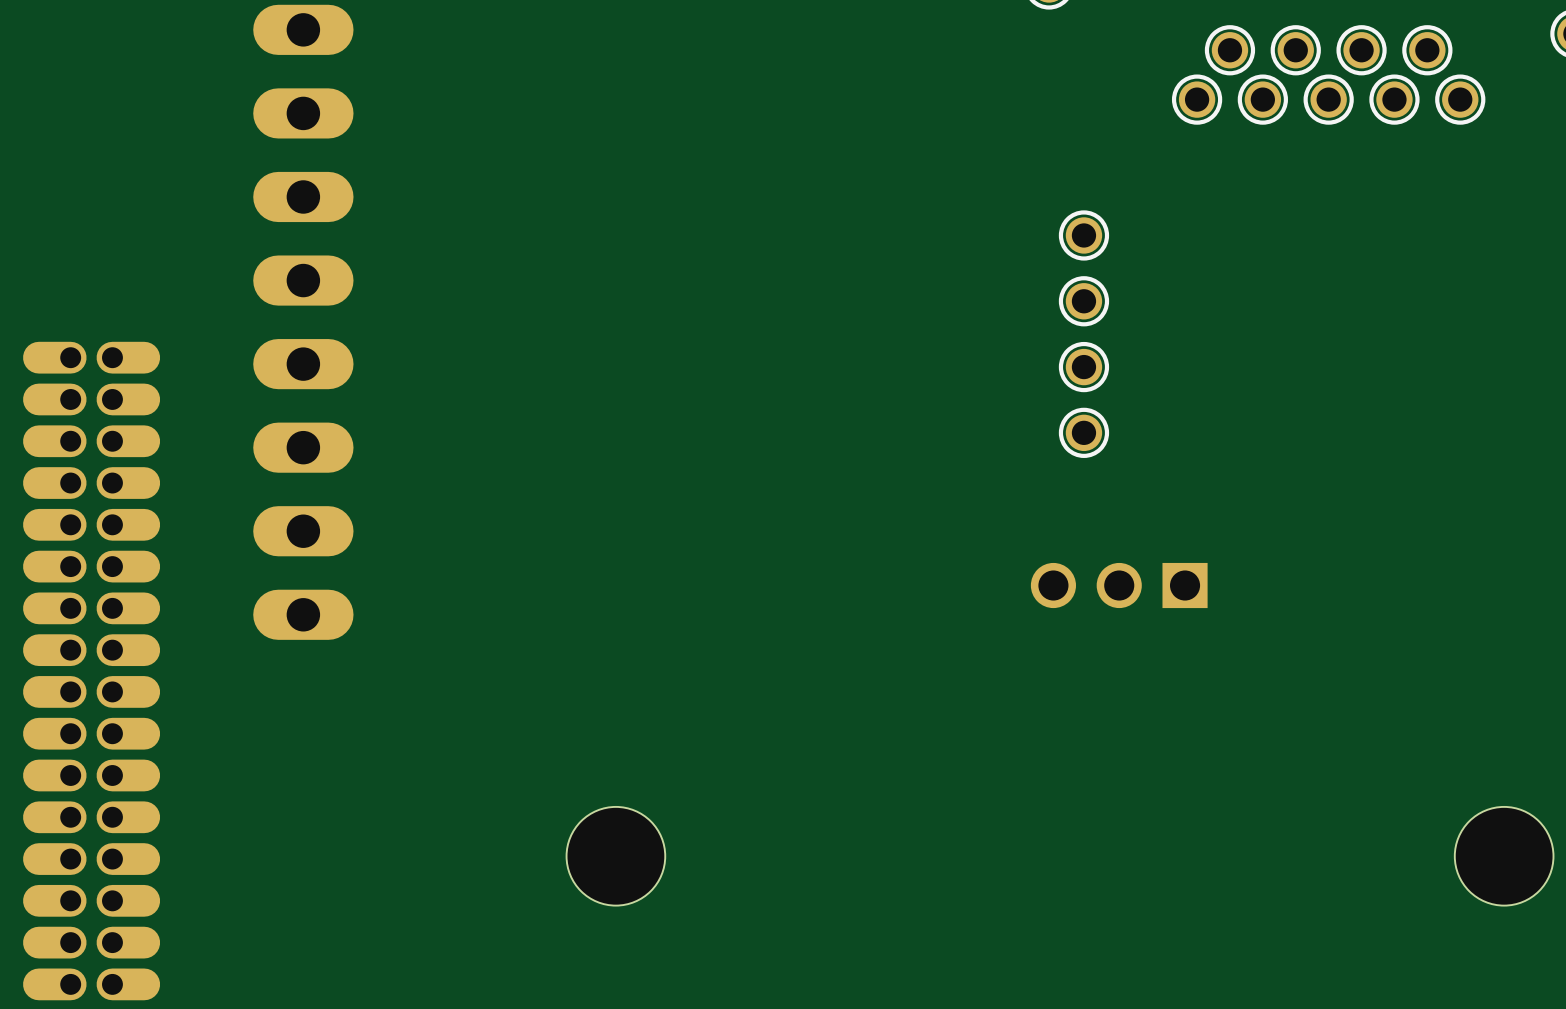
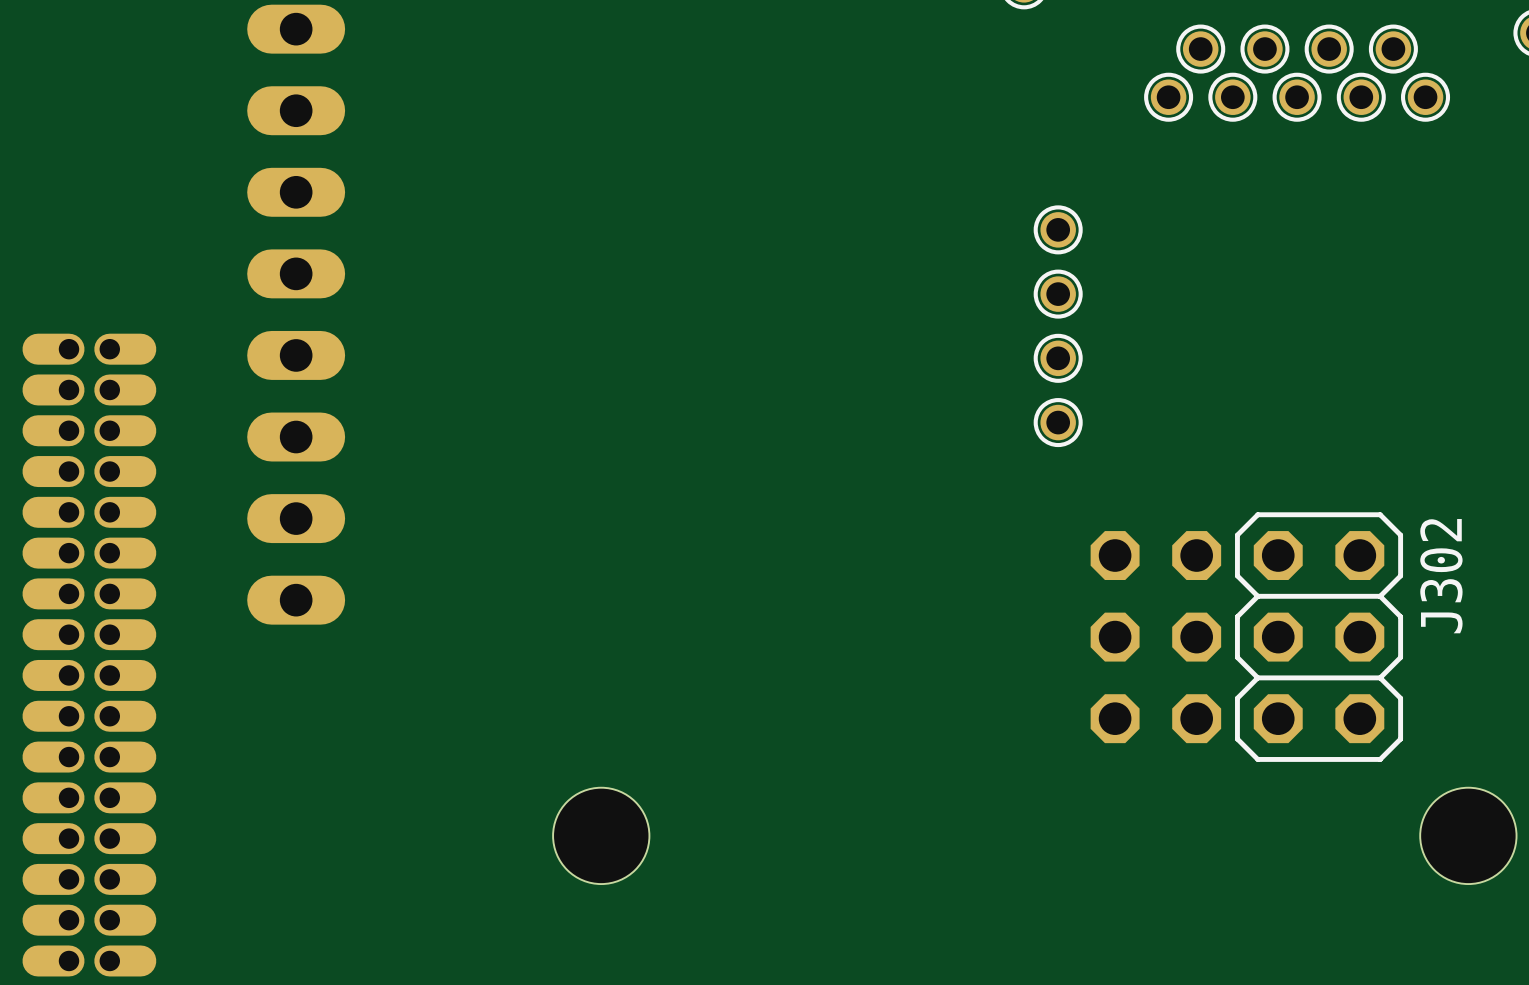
part: (1119, 585) -> none
part: none -> (1155, 637)
J302: none -> (1319, 637)

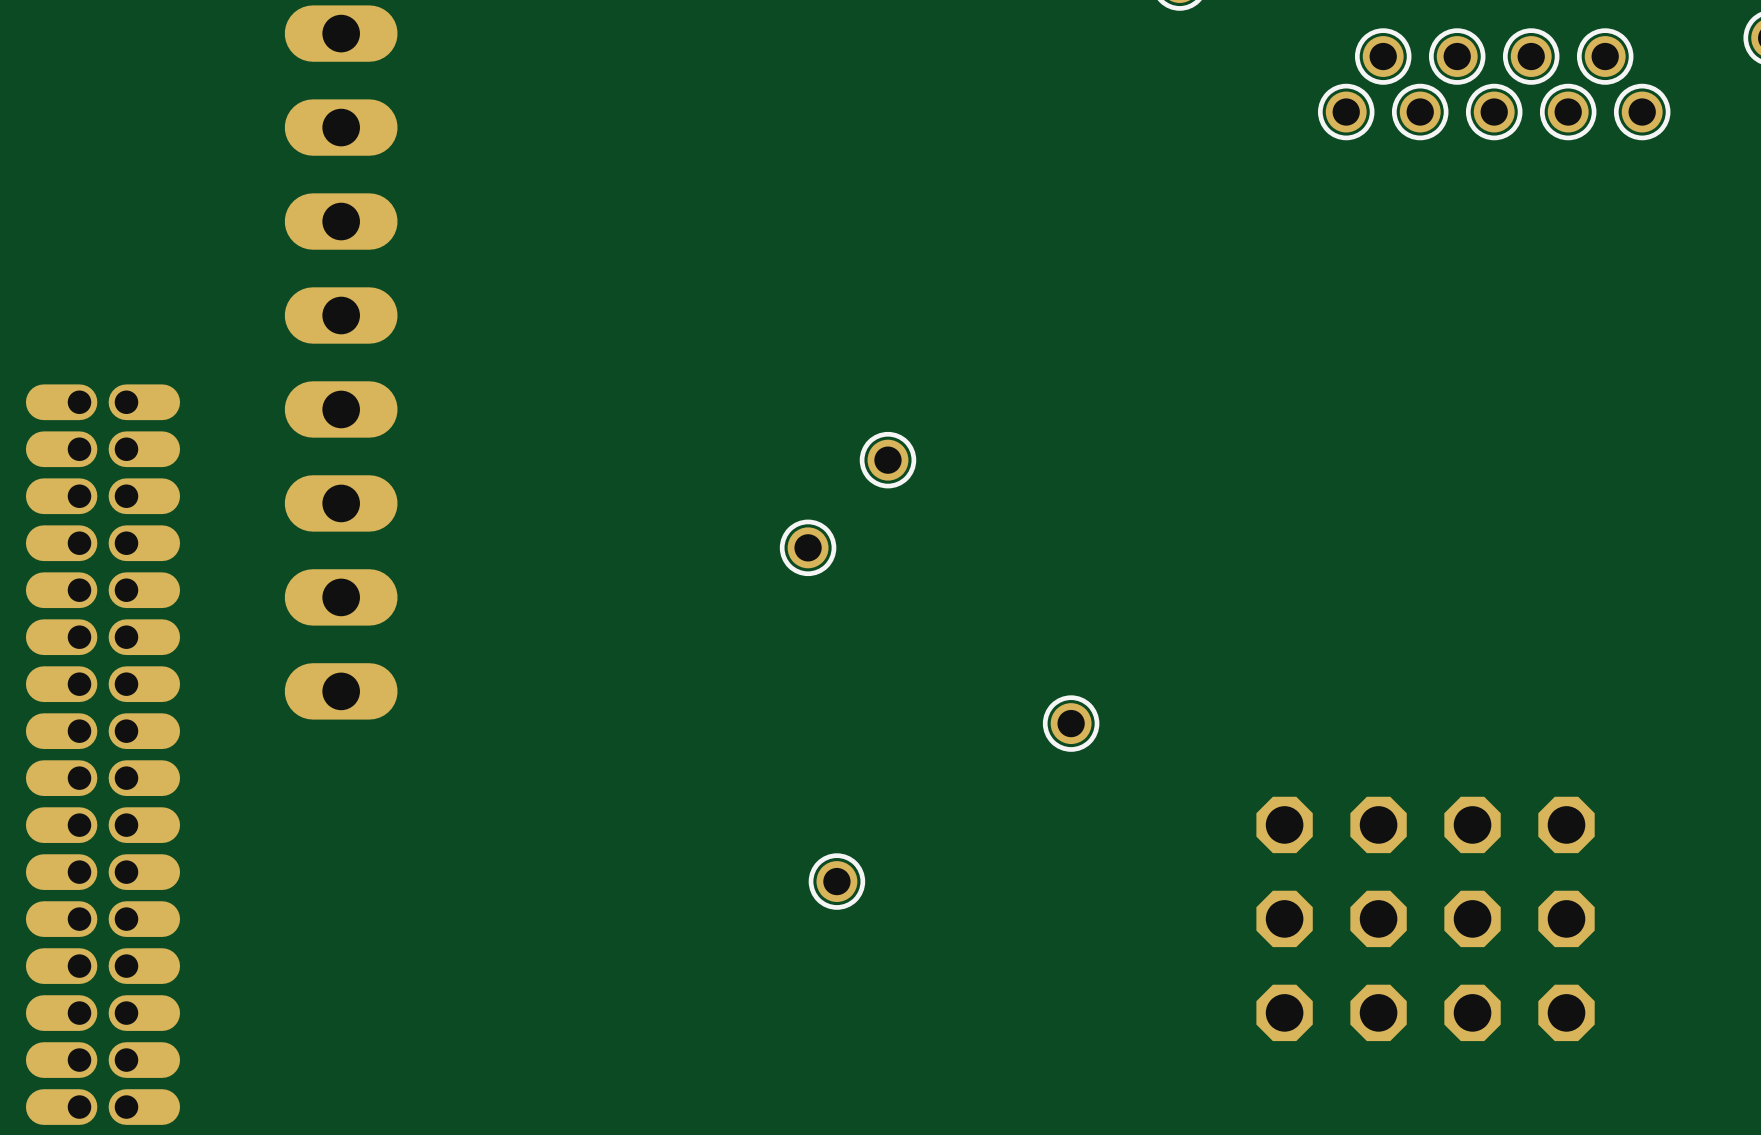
part: (1058, 229) -> none
part: (1058, 294) -> none
part position: (1058, 358) -> (1071, 723)
part: none -> (887, 460)
part: (1058, 422) -> none
part: none -> (808, 547)
part position: (1155, 637) -> (1331, 918)
J302 side: top (1319, 637) -> bottom (1519, 918)
part: none -> (836, 881)
hole: (601, 835) -> none
hole: (1468, 835) -> none

